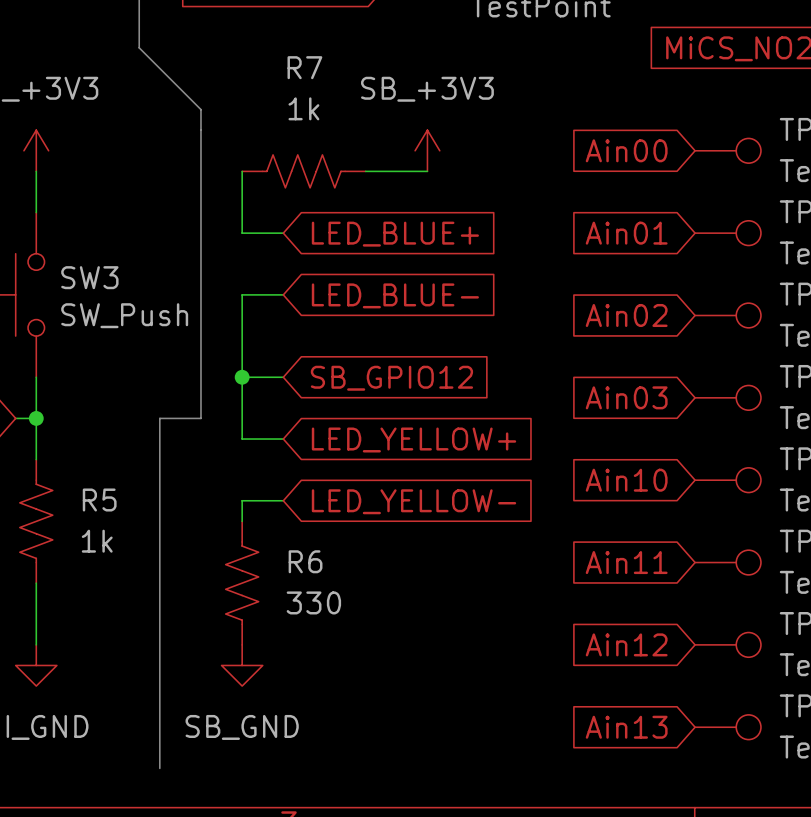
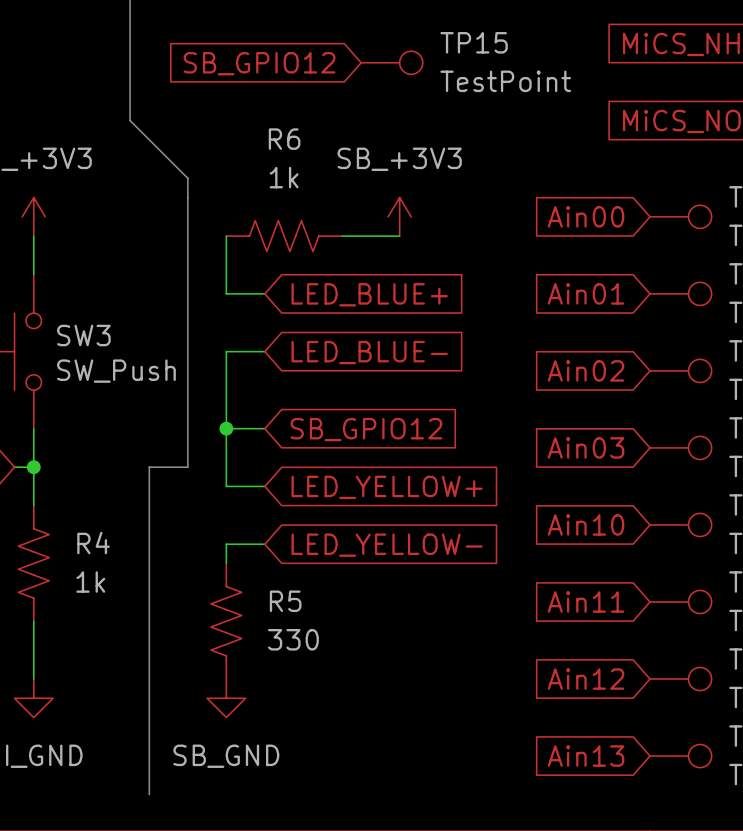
R7 name: R7 (304, 67) -> R6 (284, 139)
R5 name: R5 (99, 500) -> R4 (93, 543)
R6 name: R6 (305, 561) -> R5 (285, 601)

